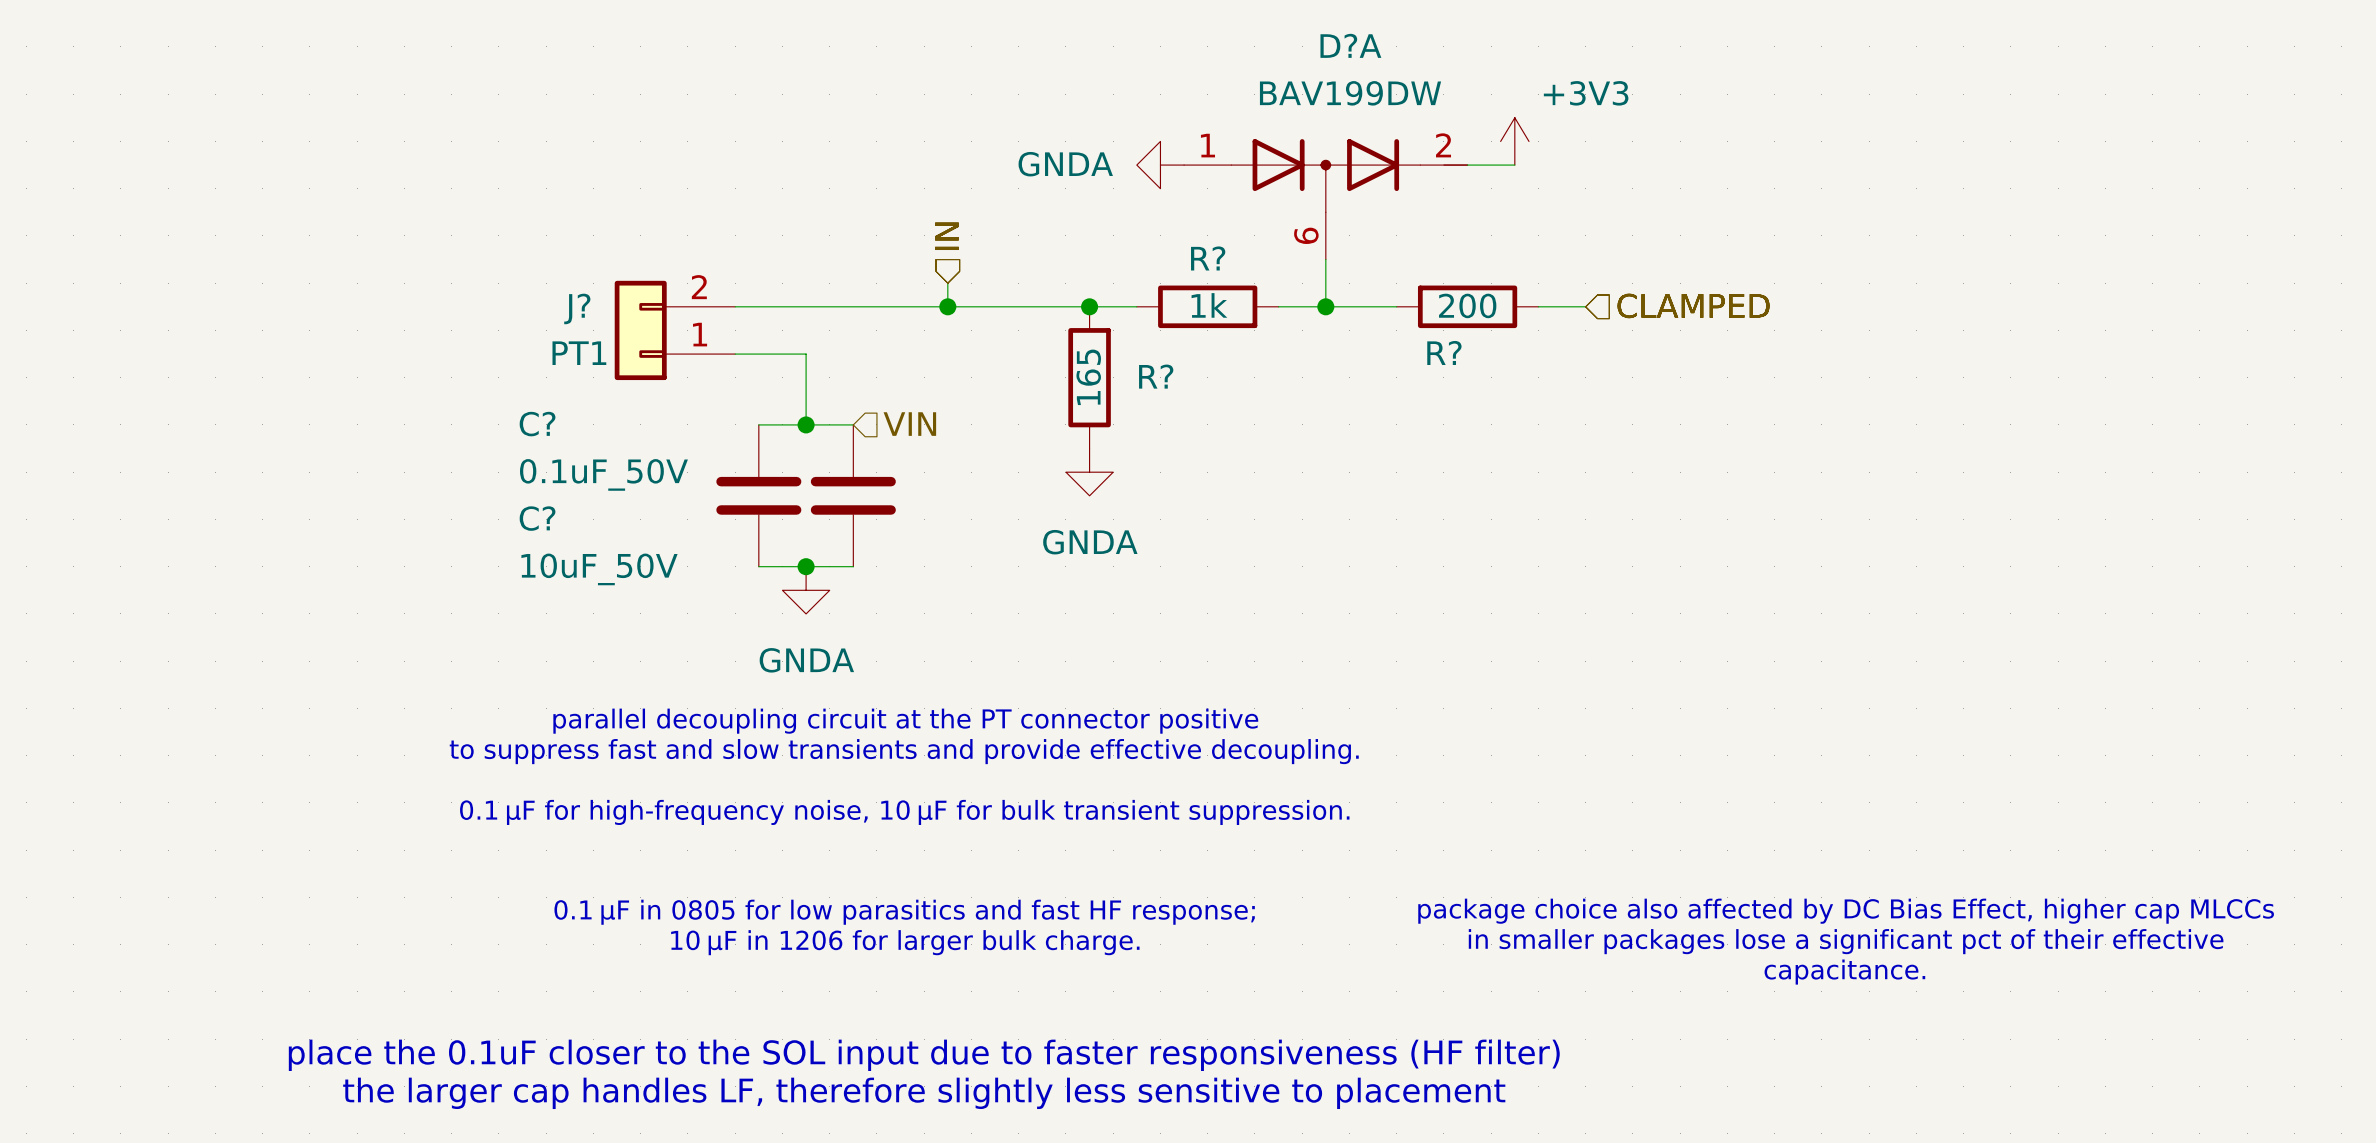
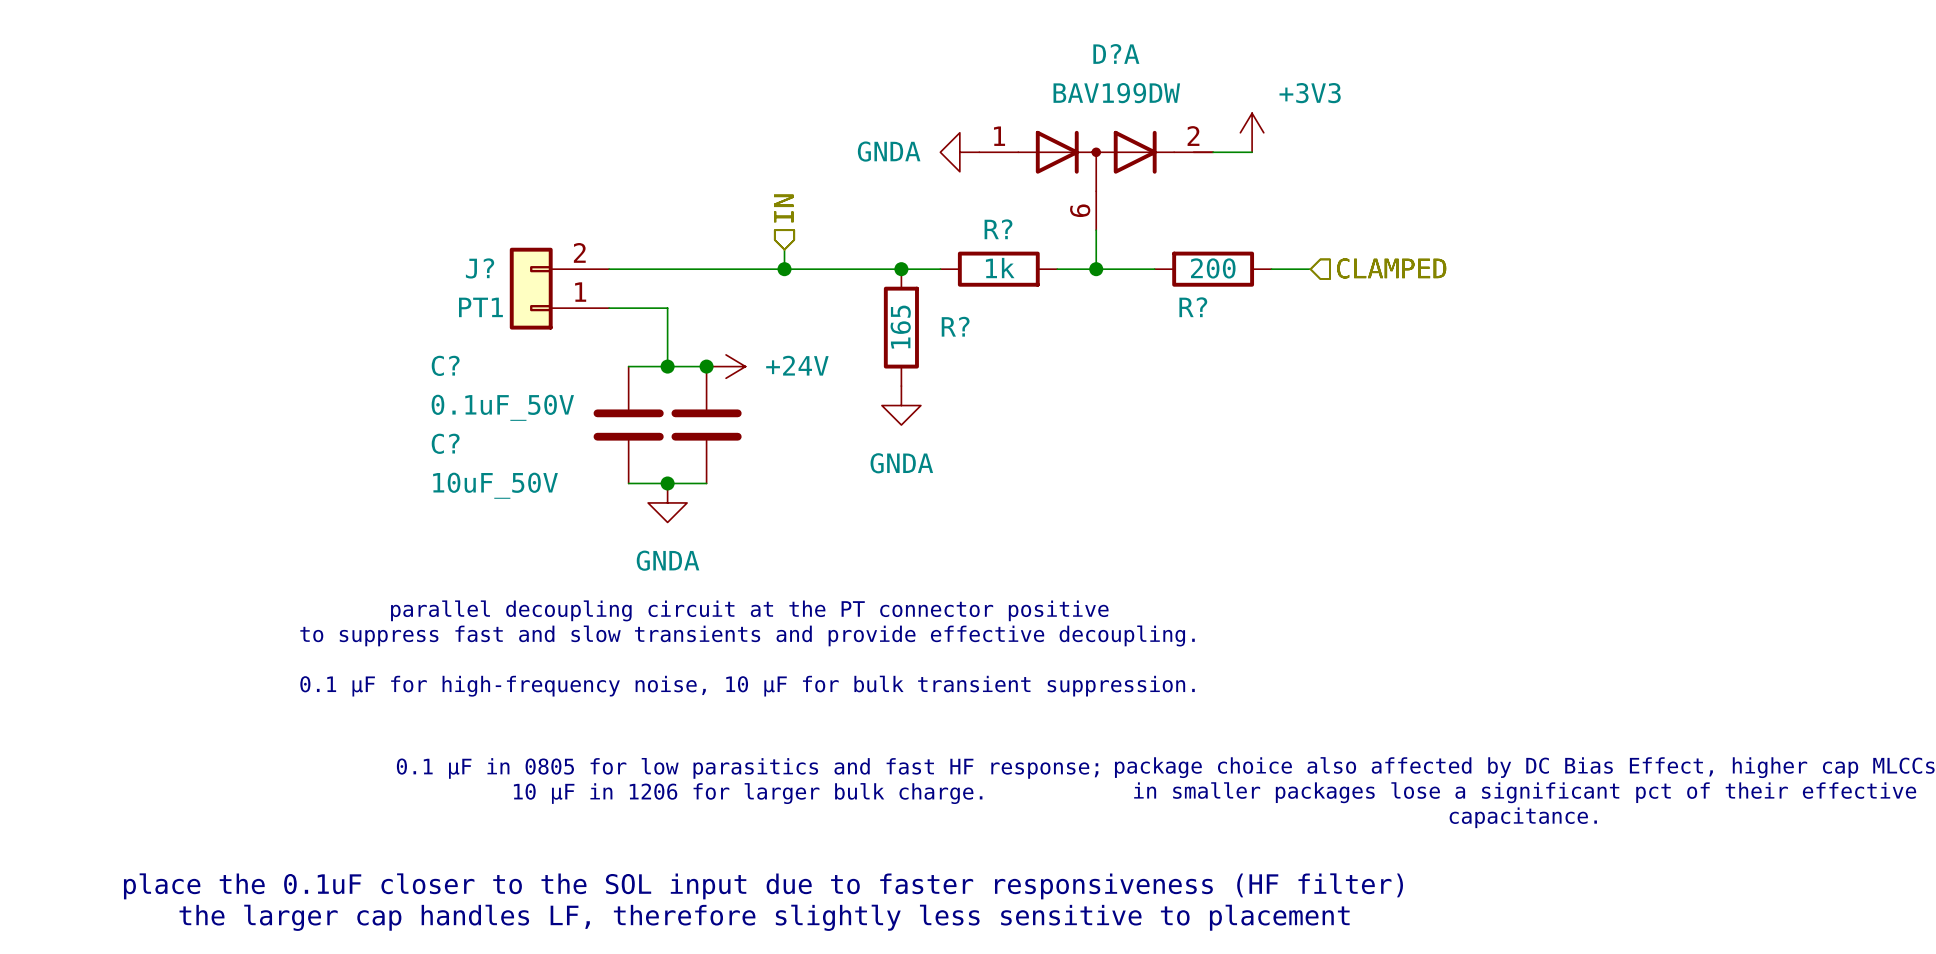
junction: none -> (706, 366)
power symbol: none -> +24V (726, 366)
hierarchical label: VIN (909, 424) -> none

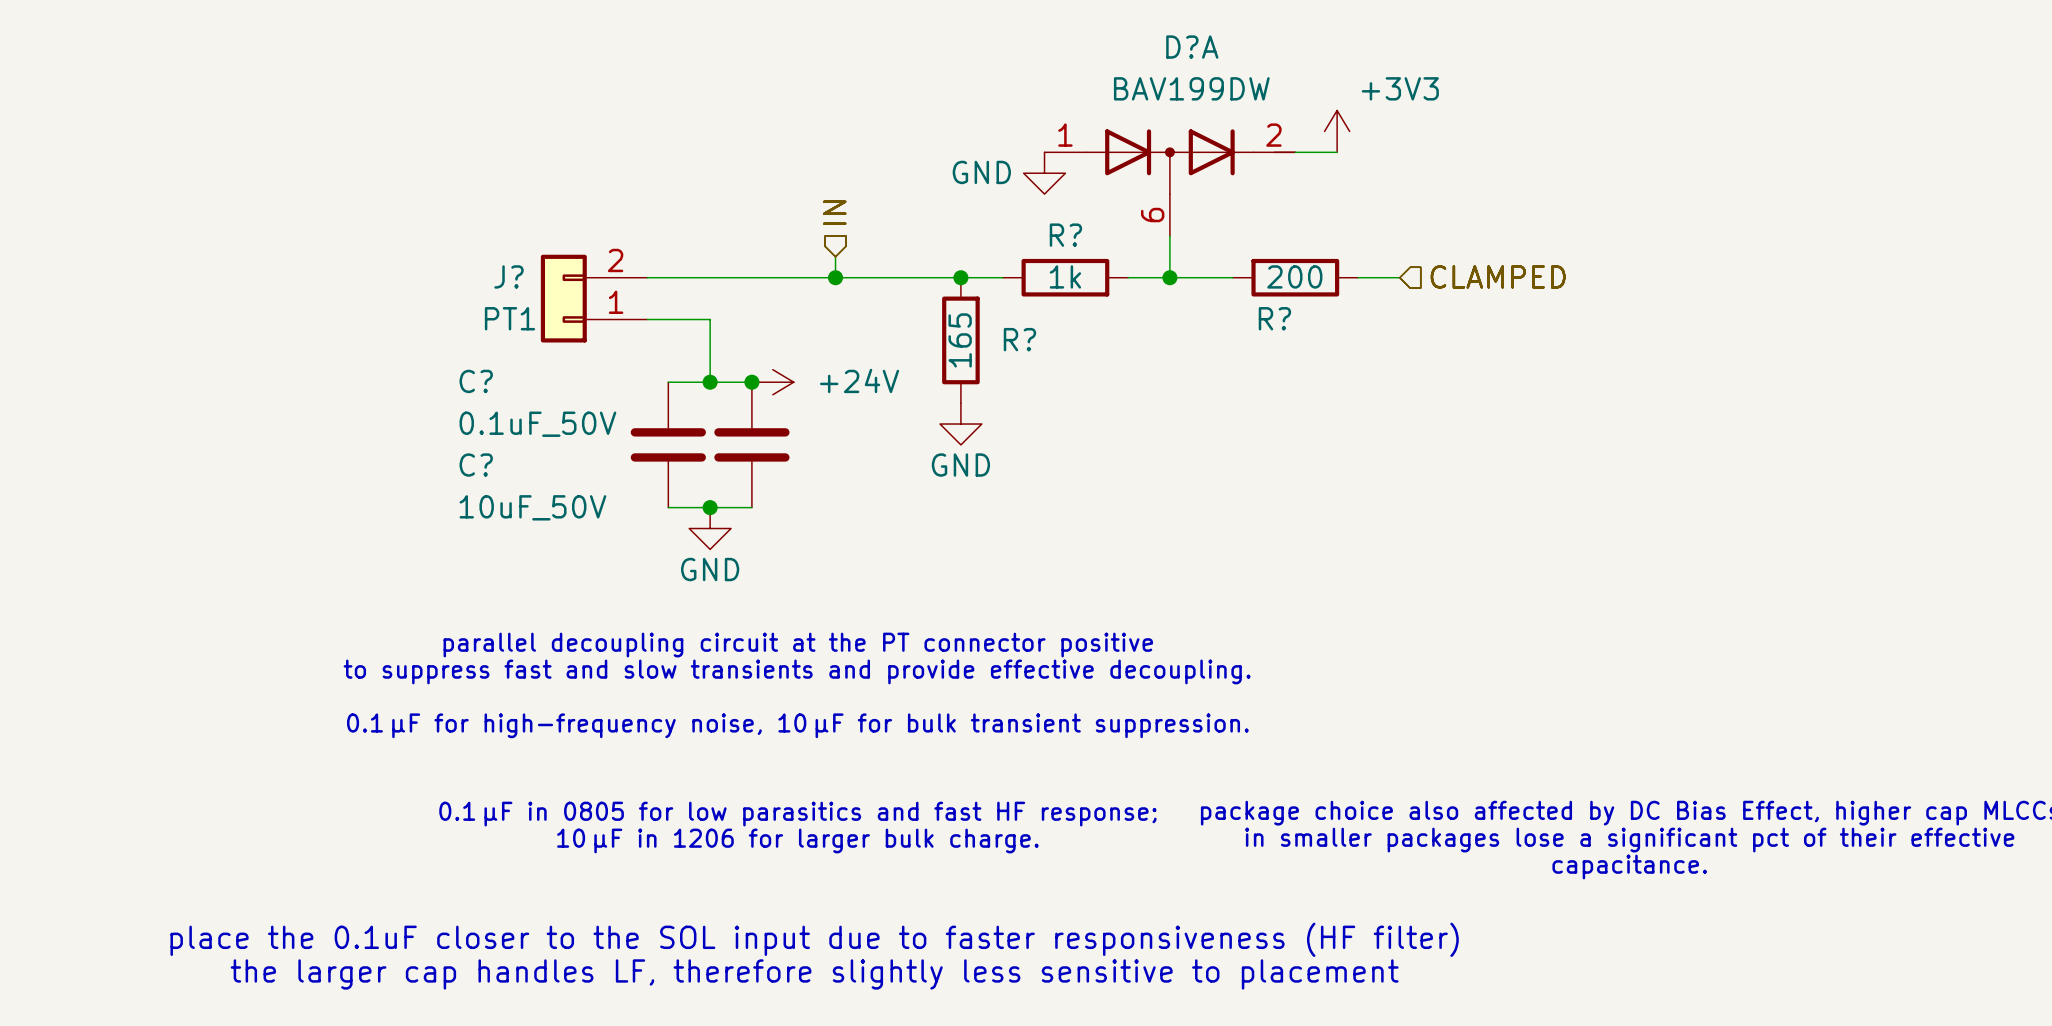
power symbol: GNDA (959, 152) -> none
power symbol: none -> GND (1044, 173)
power symbol: GNDA (901, 405) -> GND (960, 424)
power symbol: GNDA (667, 502) -> GND (710, 528)

